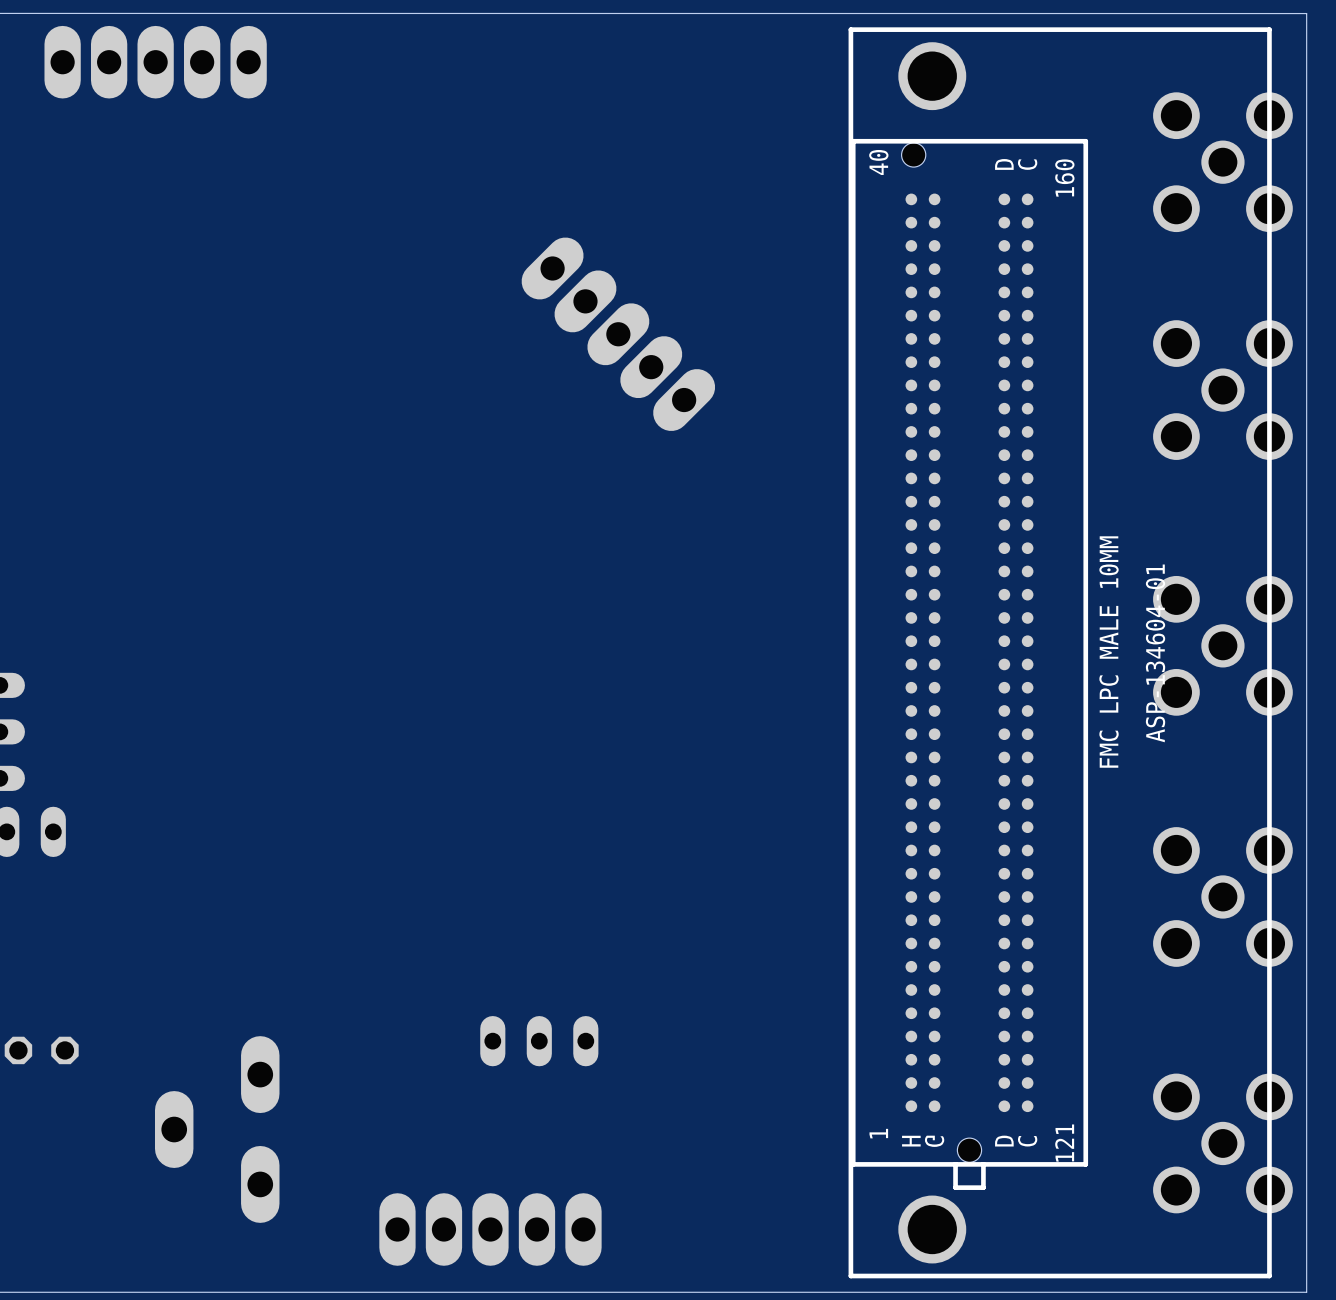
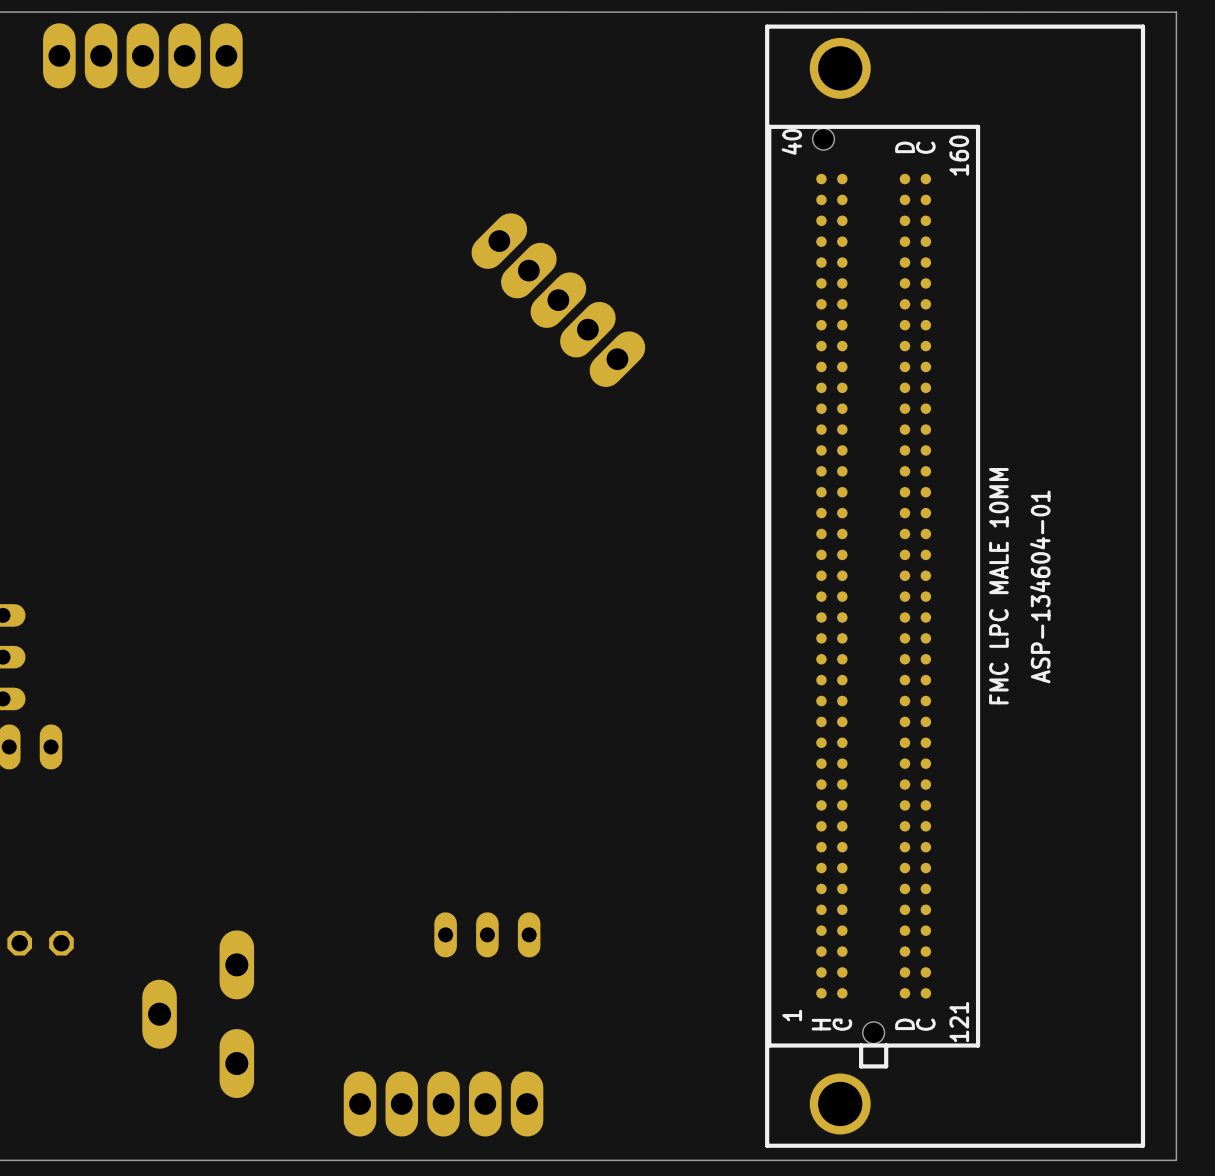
part: (1222, 162) -> none
part: (1222, 390) -> none
part: (1222, 645) -> none
part: (1222, 896) -> none
part: (1222, 1143) -> none

